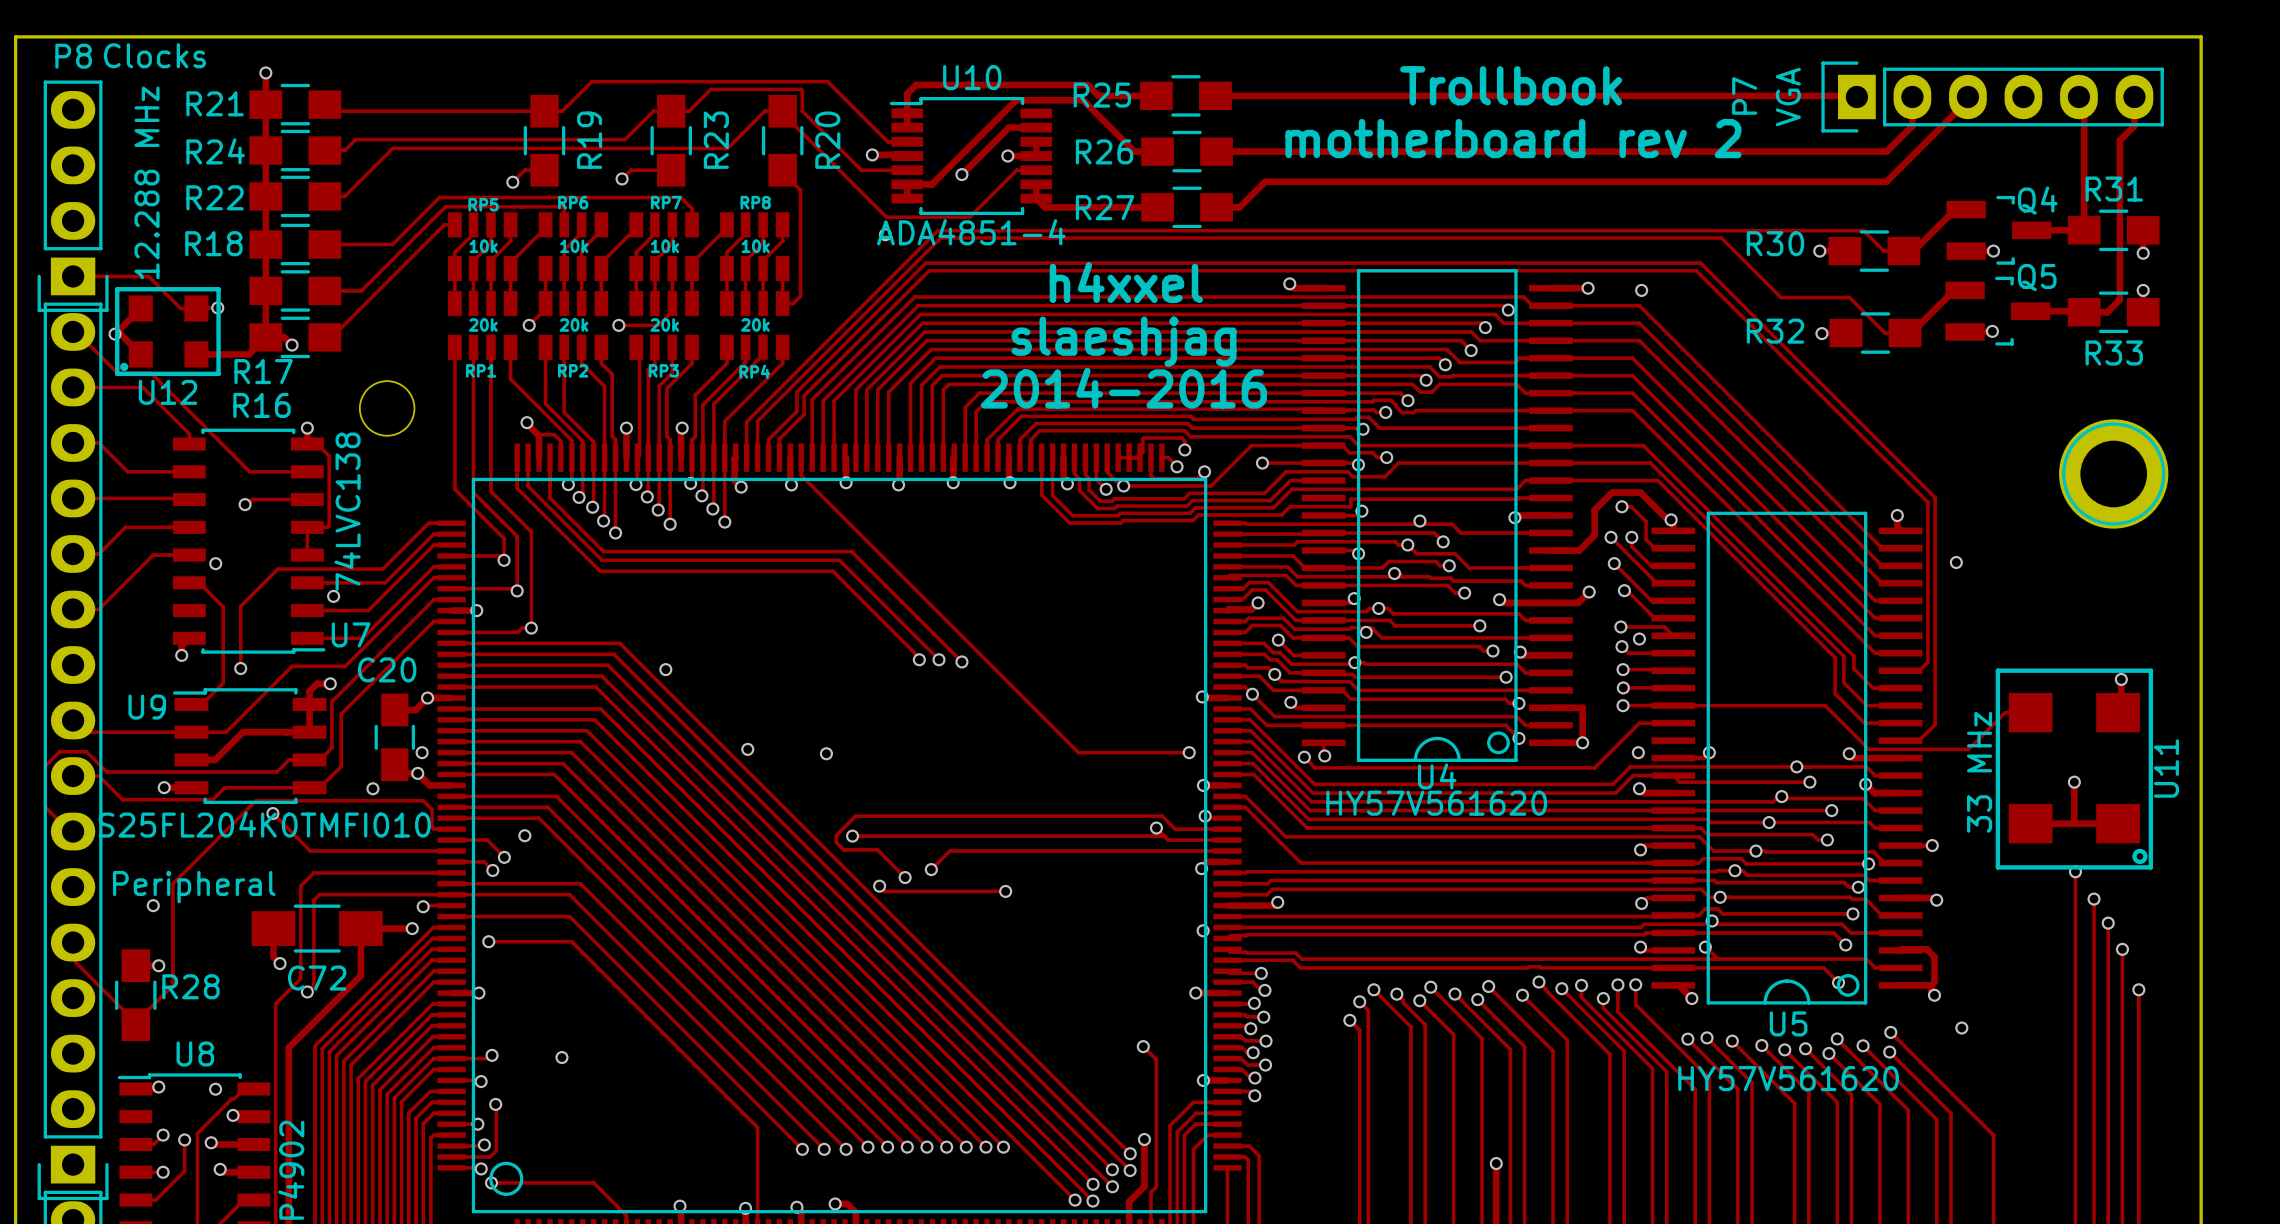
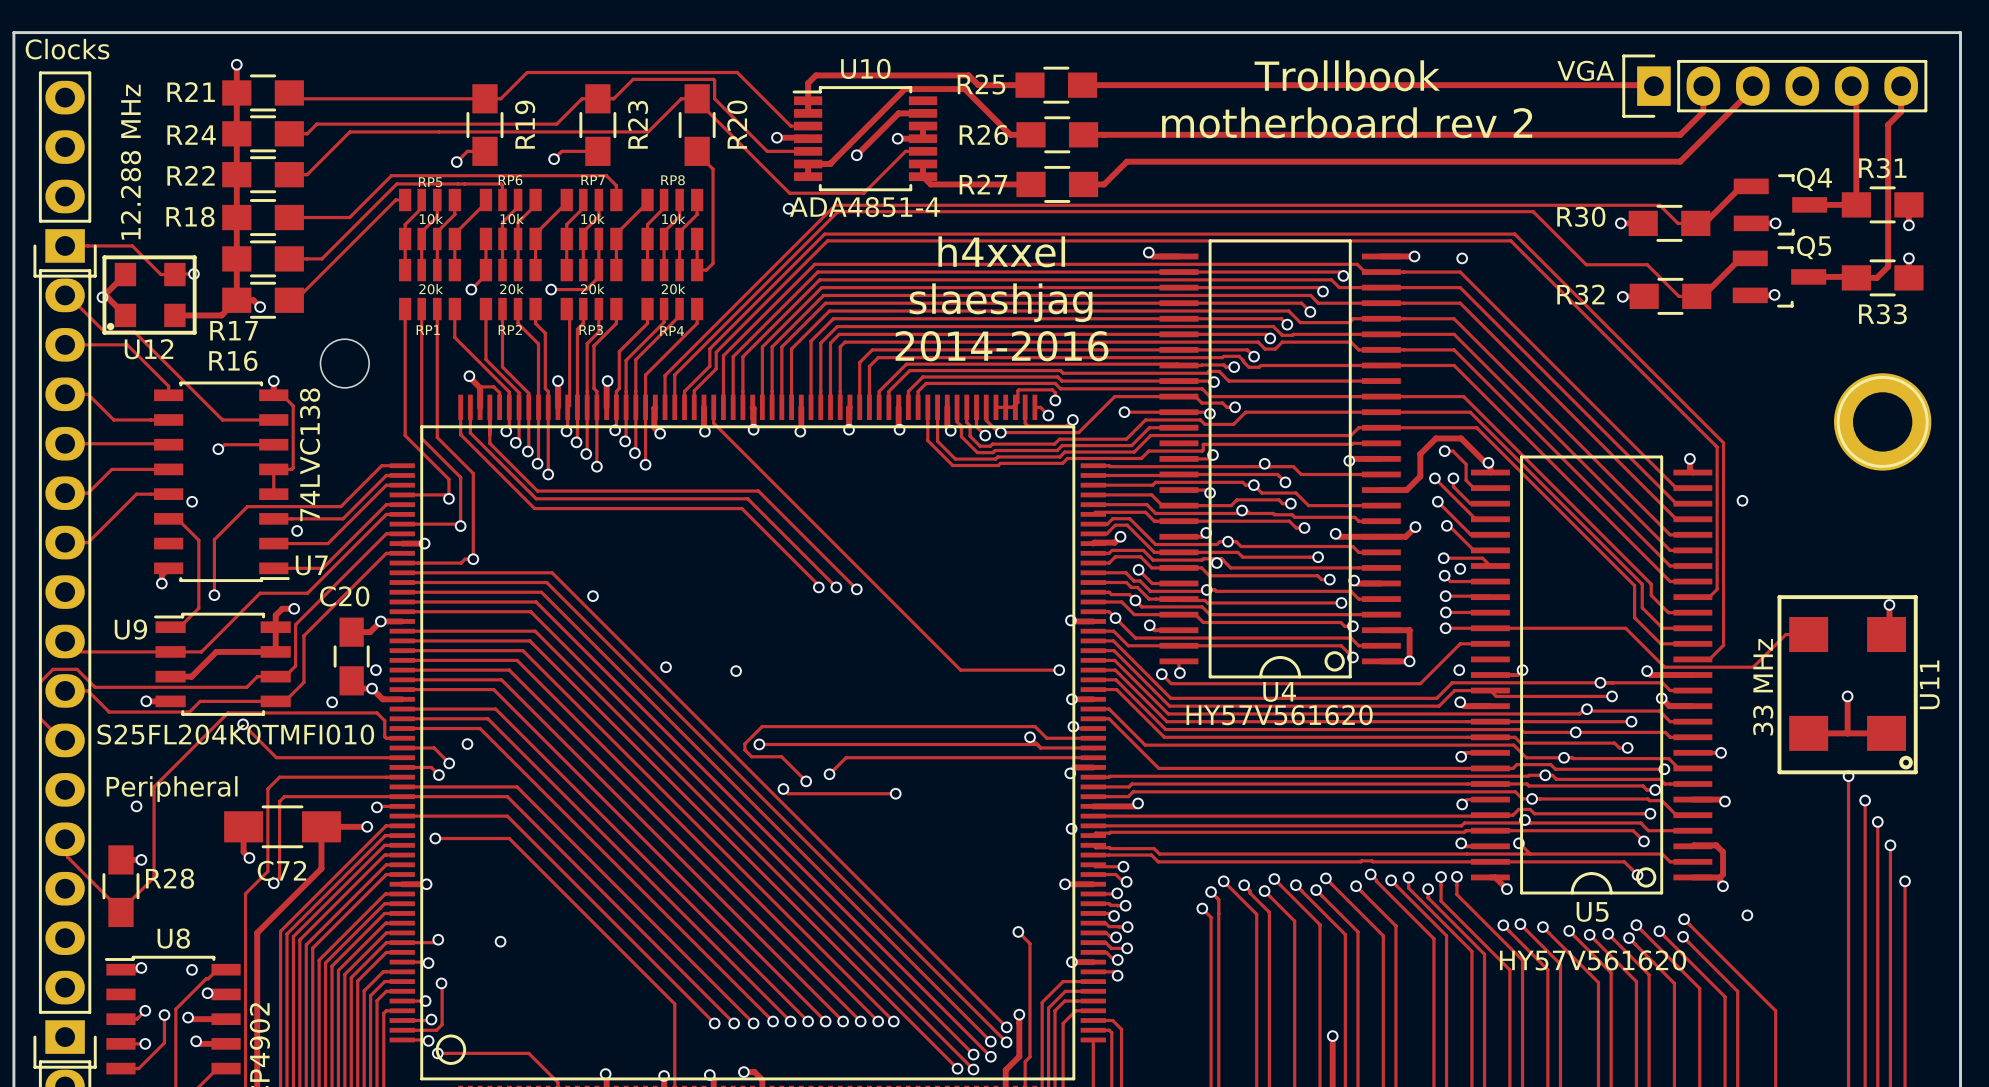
P8 value position: Clocks (154, 55) -> Clocks (67, 49)
P8 name: P8 (73, 56) -> none
P7 name: P7 (1744, 95) -> none
P7 value rotation: 0° (1788, 97) -> 90° clockwise (1585, 70)

